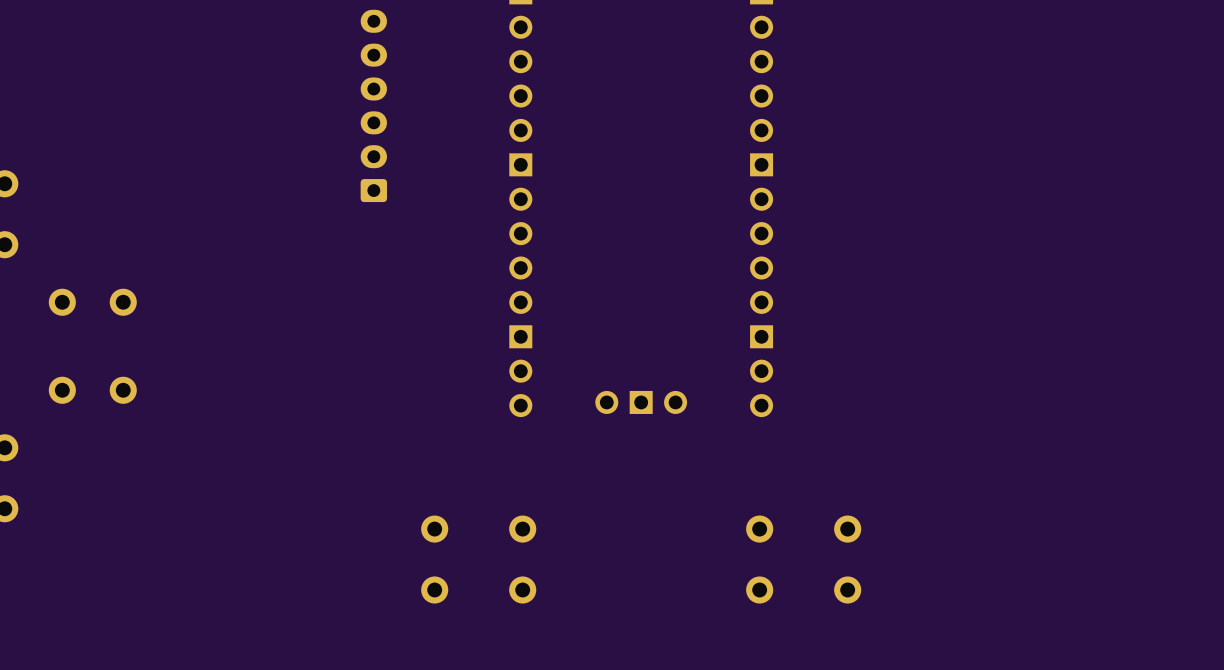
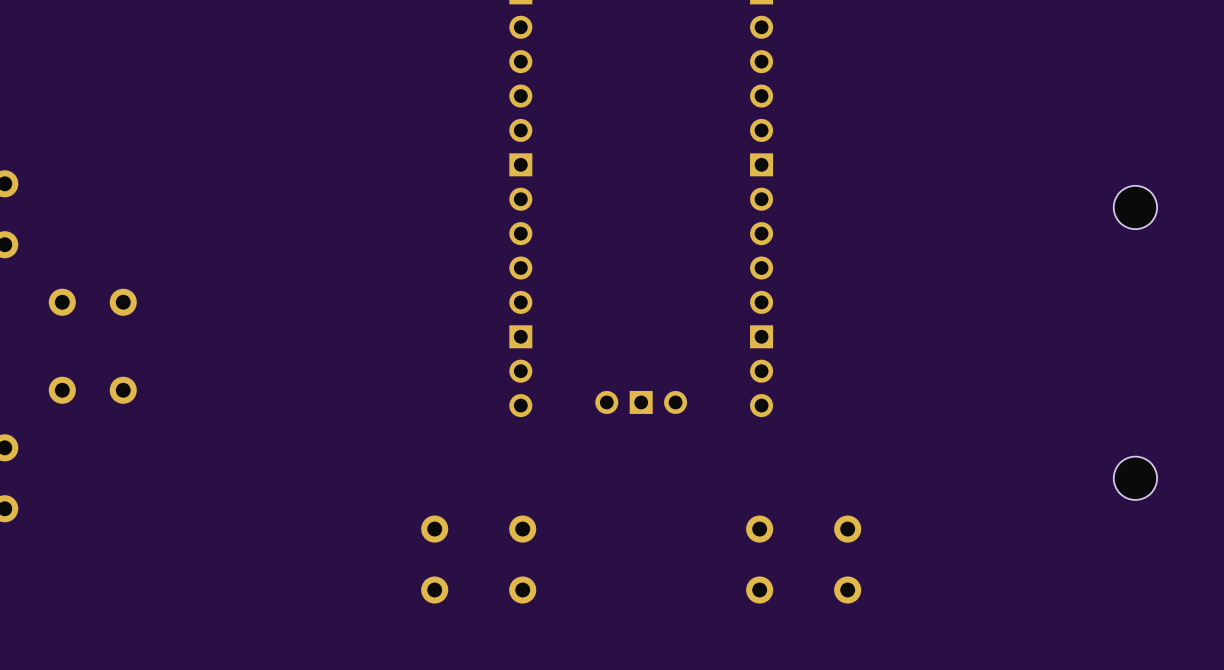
part: (373, 105) -> none
part: none -> (1135, 207)
part: none -> (1135, 478)

